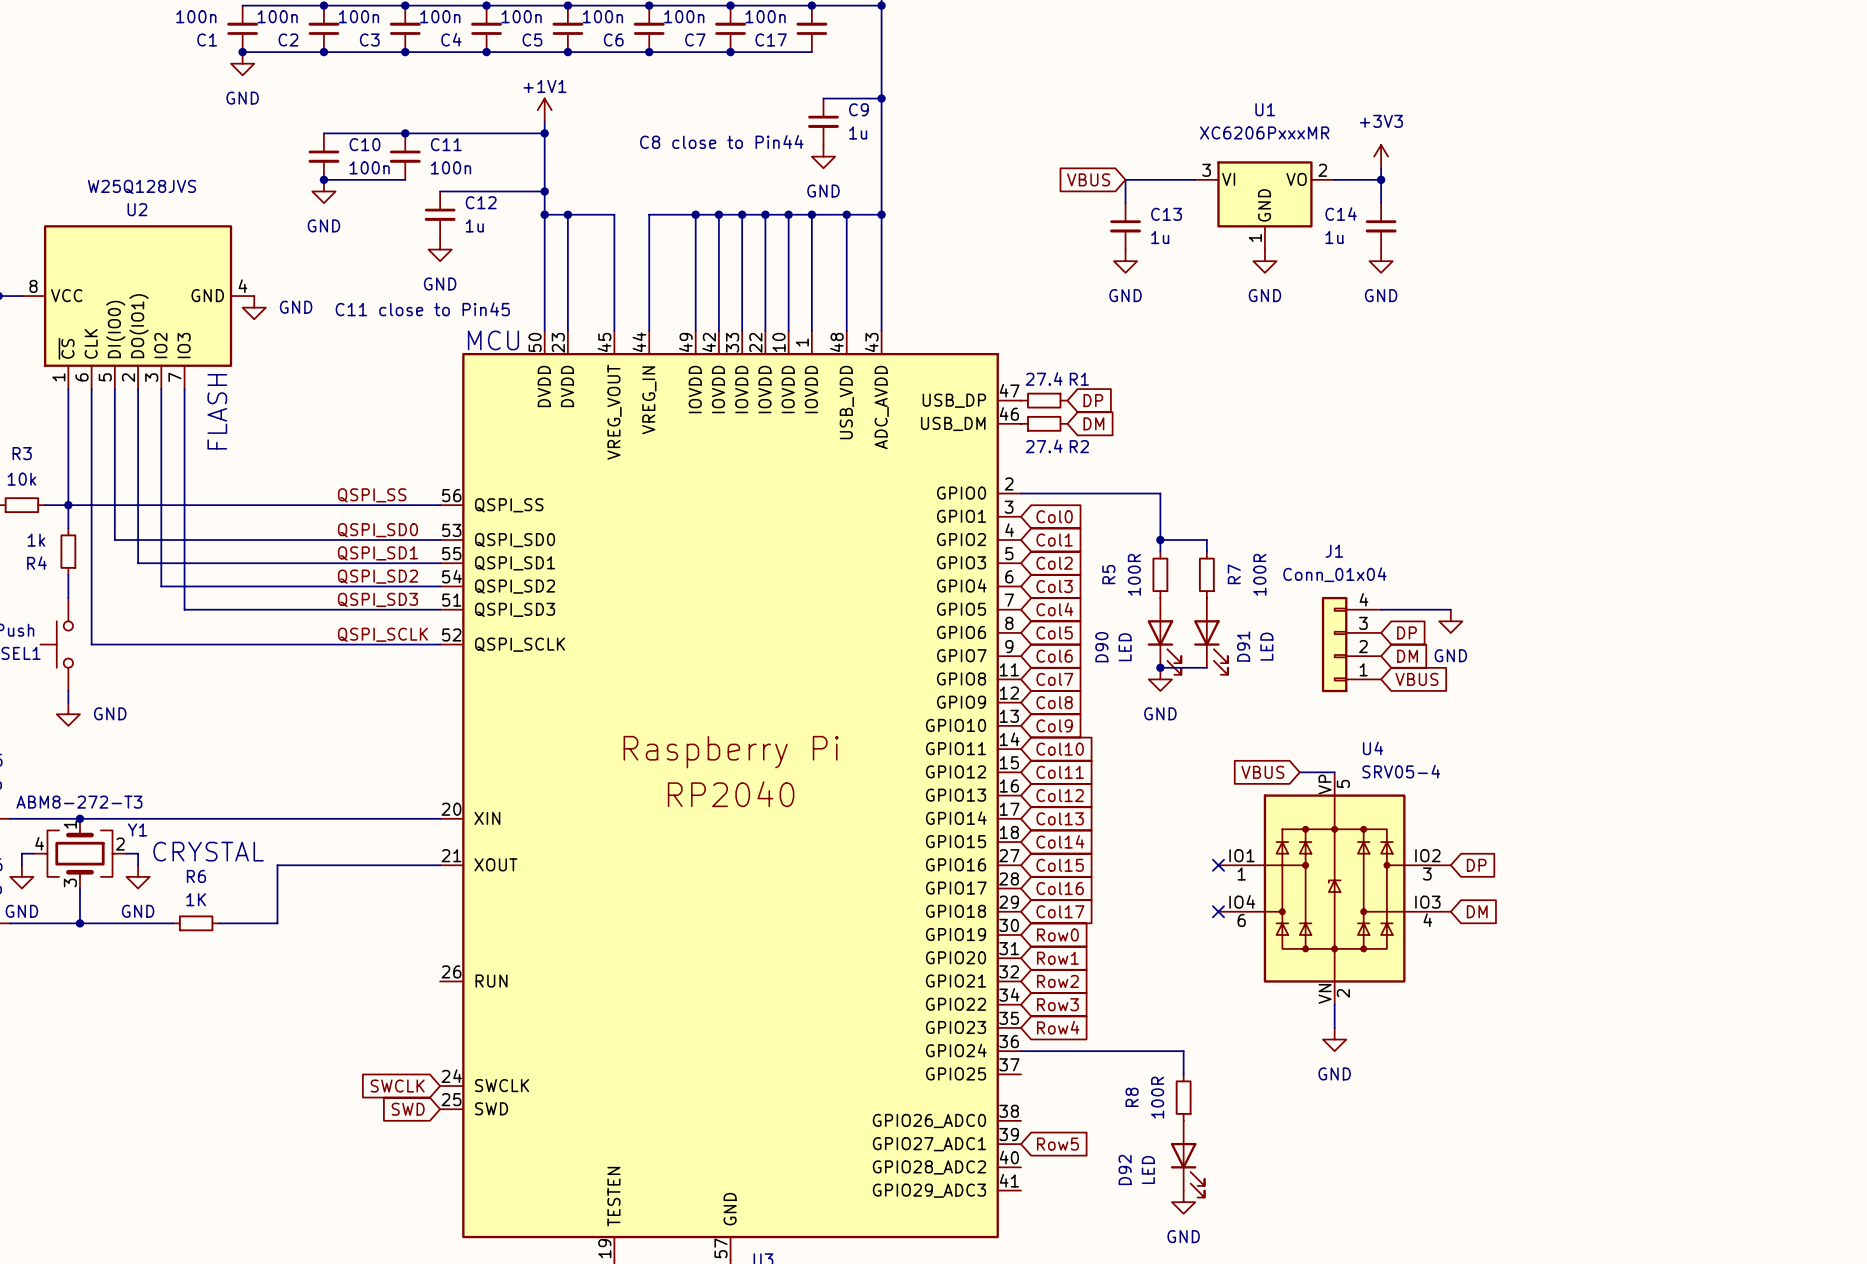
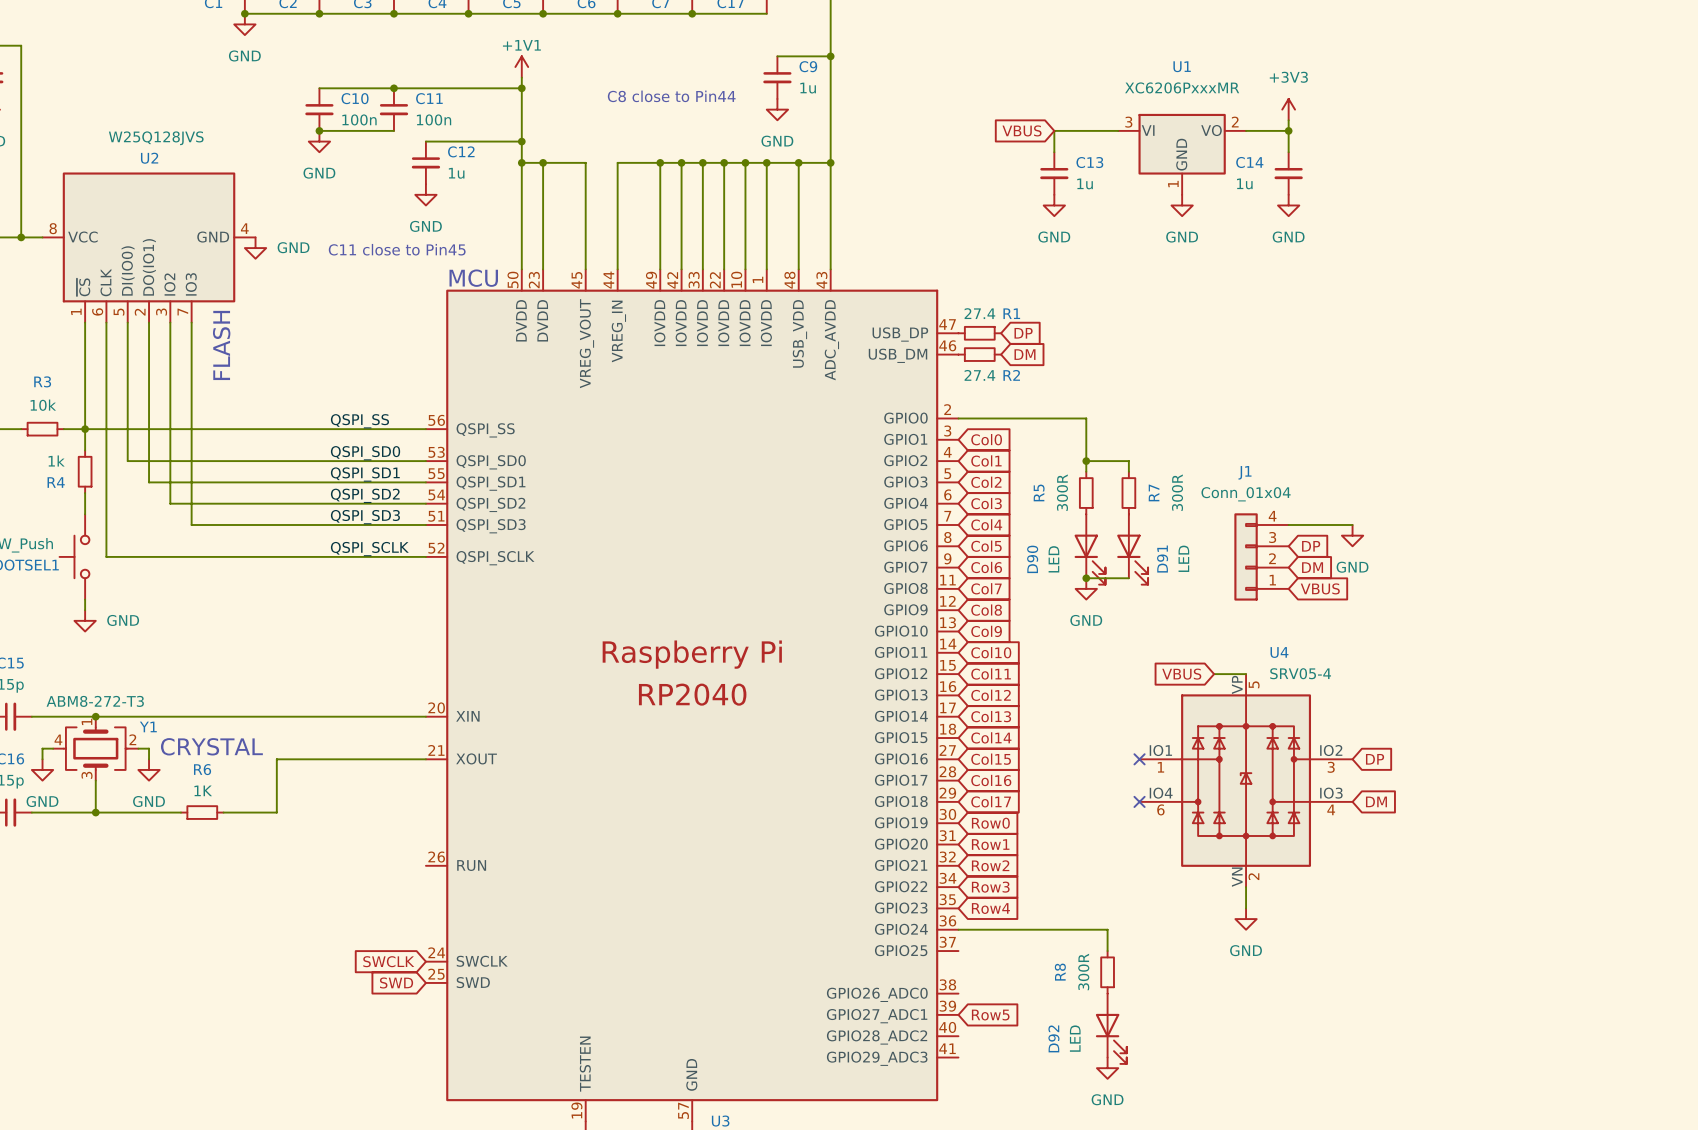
R5 value: 100R (1134, 574) -> 300R (1062, 492)
R7 value: 100R (1259, 574) -> 300R (1177, 492)
R8 value: 100R (1157, 1097) -> 300R (1083, 971)

